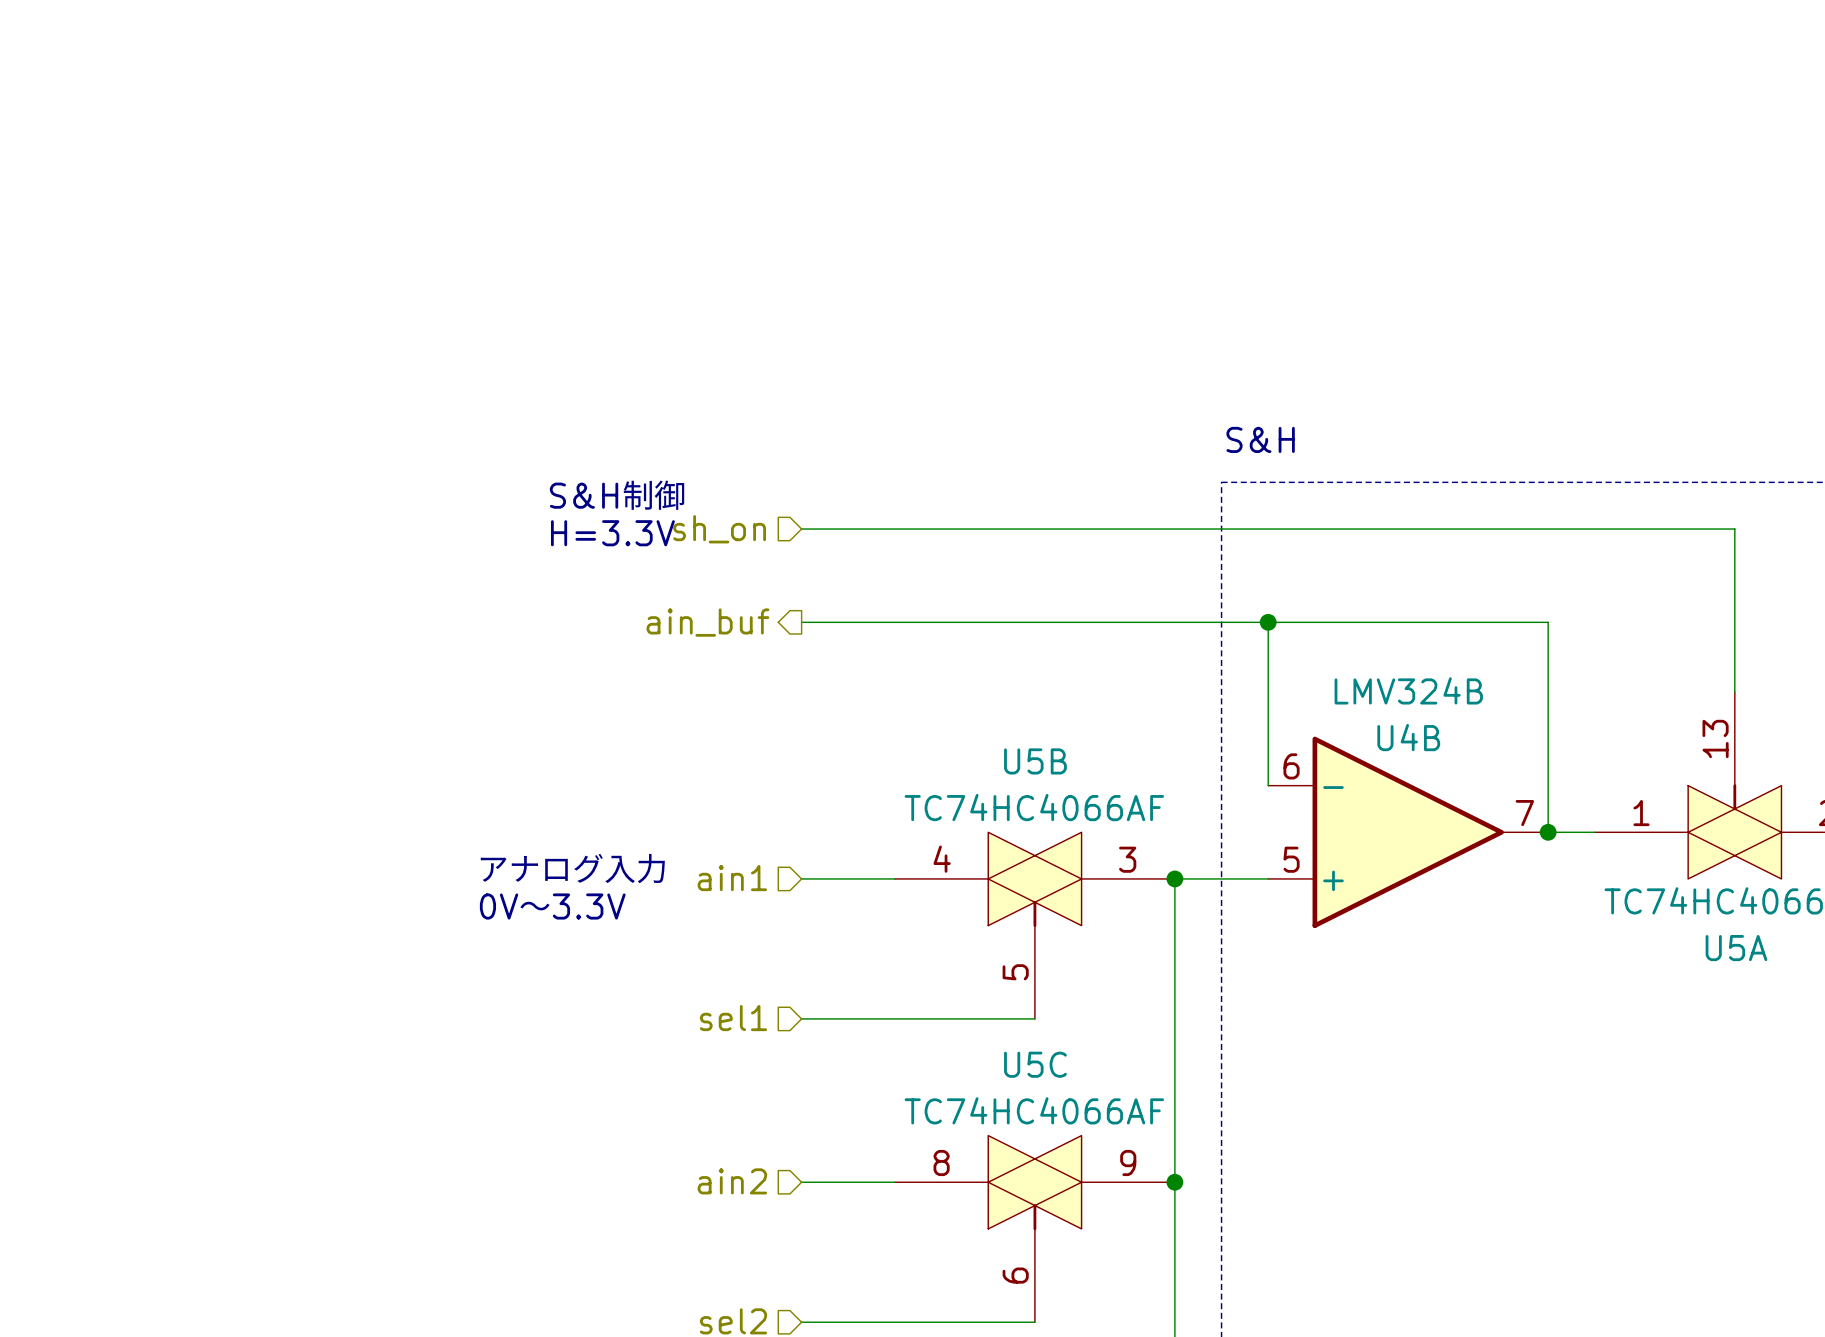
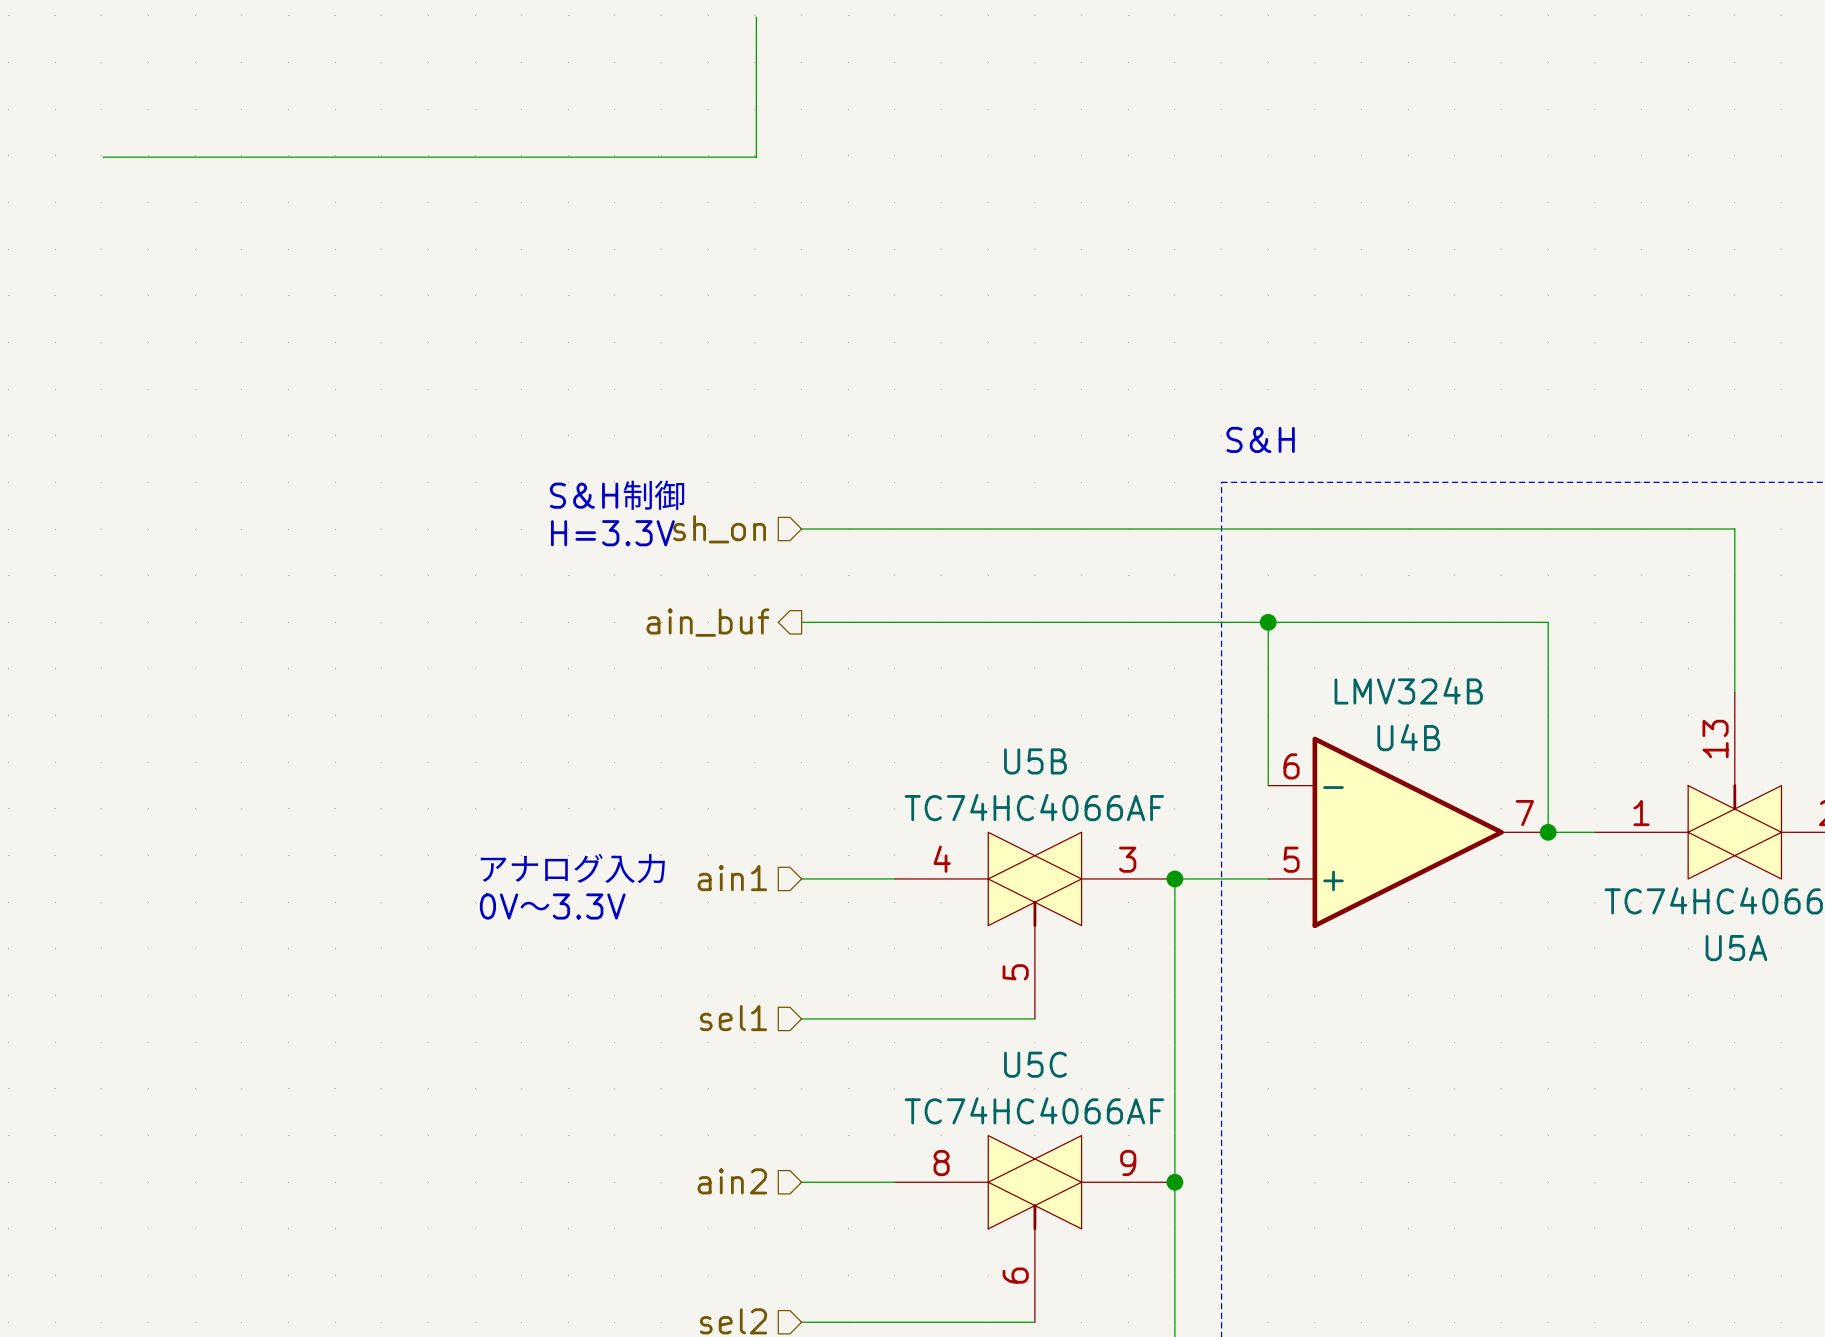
wire: none -> (756, 17) (756, 157) (103, 157)

